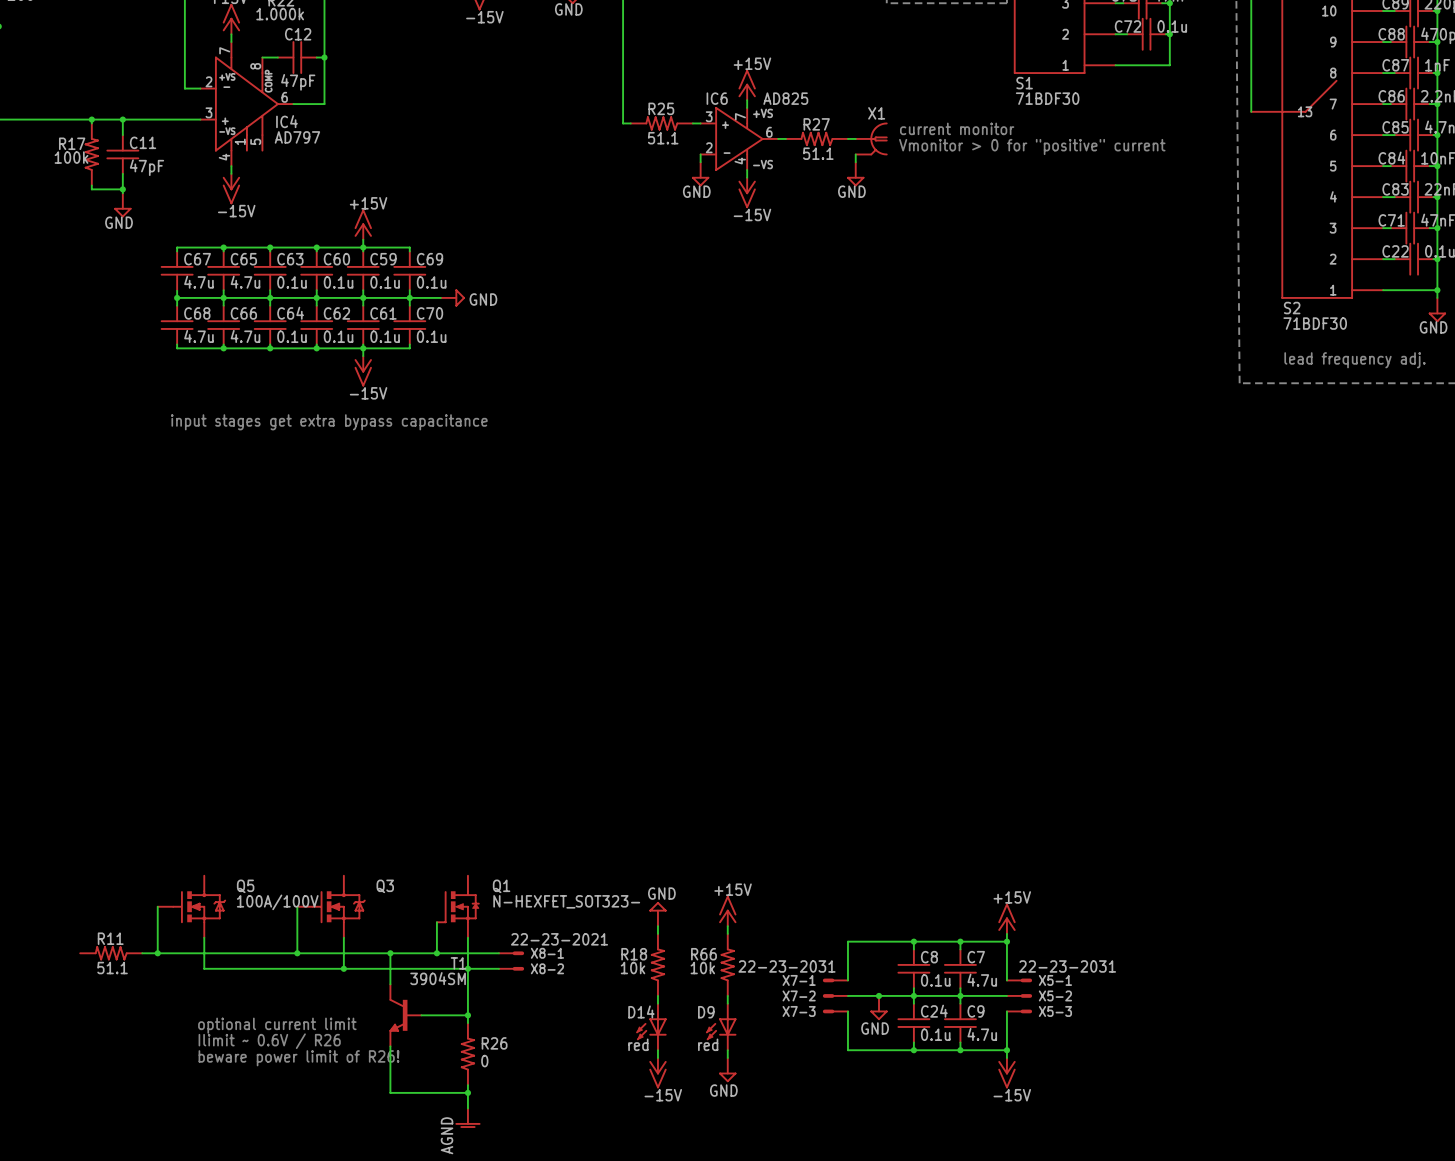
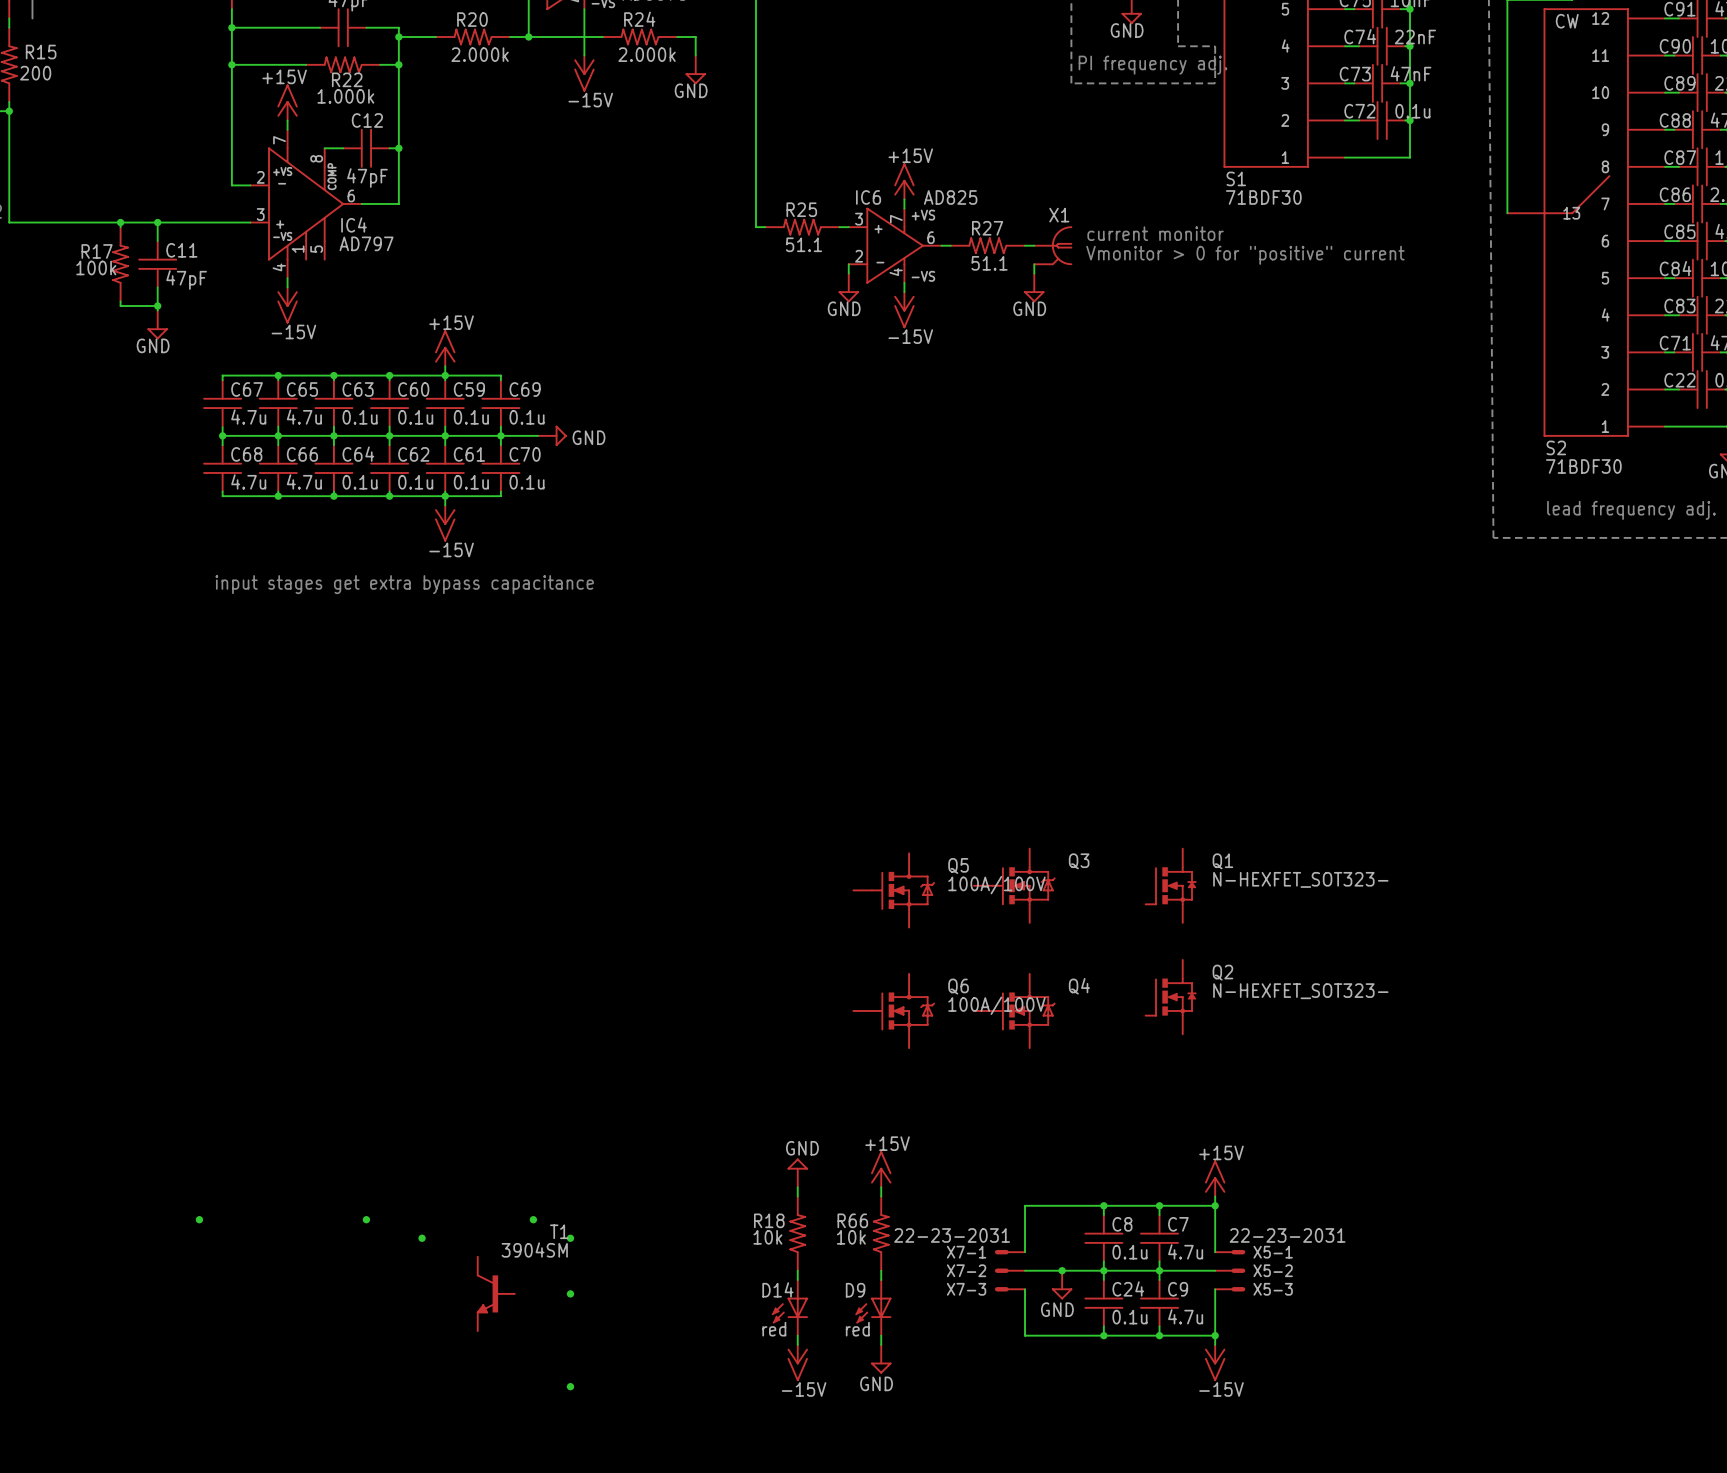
Q2: none -> N-HEXFET_SOT323- (1170, 997)
Q6: none -> 100A/100V (894, 1011)
Q4: none -> (1014, 1011)
wire: (157, 906) (157, 953) -> none
Q5 position: (191, 906) -> (894, 890)
wire: (297, 906) (297, 953) -> none
Q3 position: (331, 906) -> (1014, 885)
Q1 position: (457, 906) -> (1170, 885)
wire: (436, 922) (436, 953) -> none
wire: (204, 937) (204, 968) (498, 968) -> none
wire: (343, 937) (343, 968) -> none
wire: (467, 937) (467, 1023) -> none
R11: 51.1 (111, 953) -> none
wire: (142, 953) (498, 953) -> none
wire: (390, 953) (390, 984) -> none
junction: (390, 953) -> none
X8-1: 22-23-2021 (511, 953) -> none
X8-2: (511, 968) -> none
wire: (421, 1015) (467, 1015) -> none
text: optional current limit (277, 1025) -> none
text: Ilimit ~ 0.6V / R26 (269, 1041) -> none
wire: (390, 1046) (390, 1092) (467, 1092) -> none
R26: 0 (467, 1054) -> none
text: beware power limit of R26! (299, 1058) -> none
wire: (467, 1085) (467, 1108) -> none
power symbol: AGND (467, 1118) -> none

